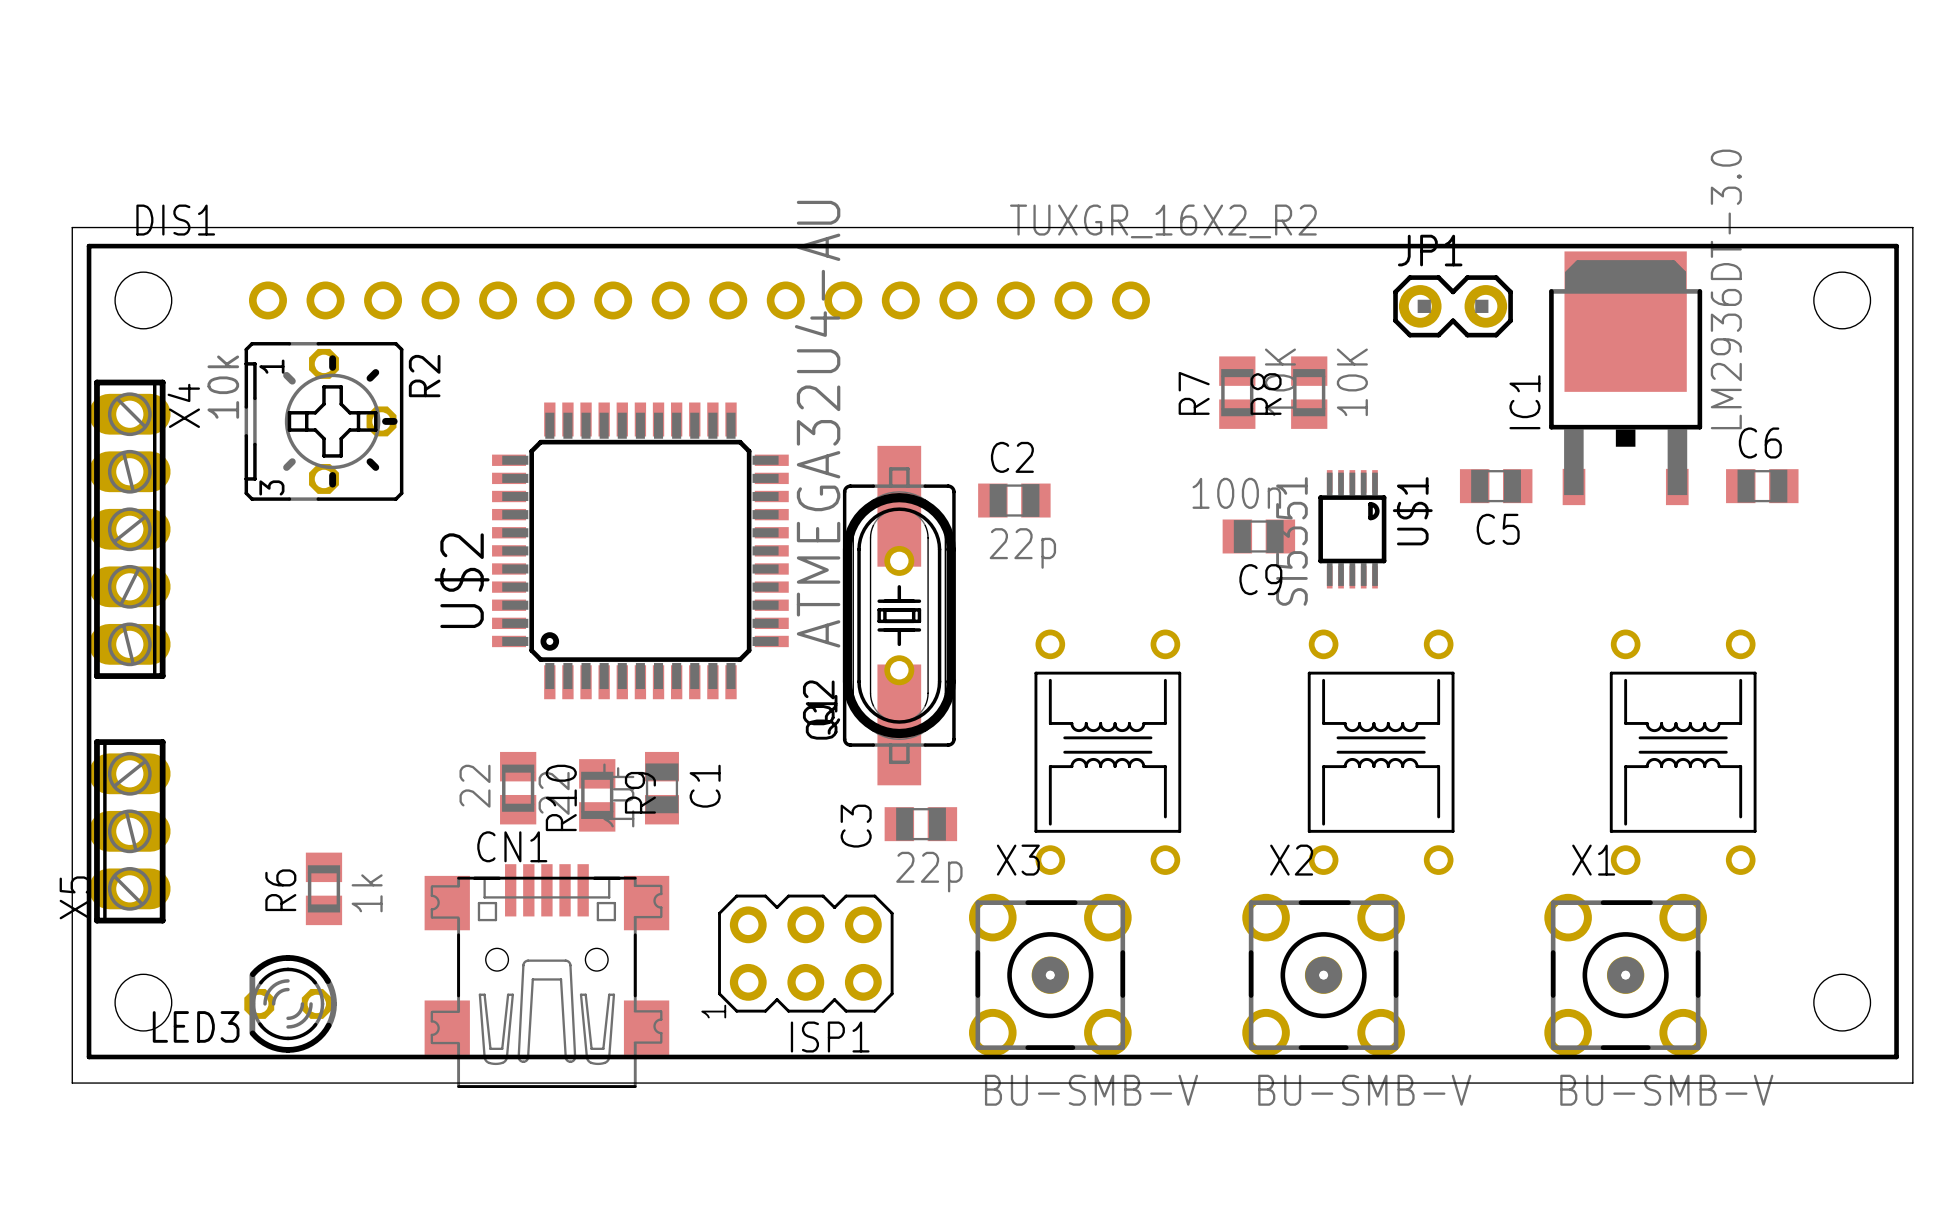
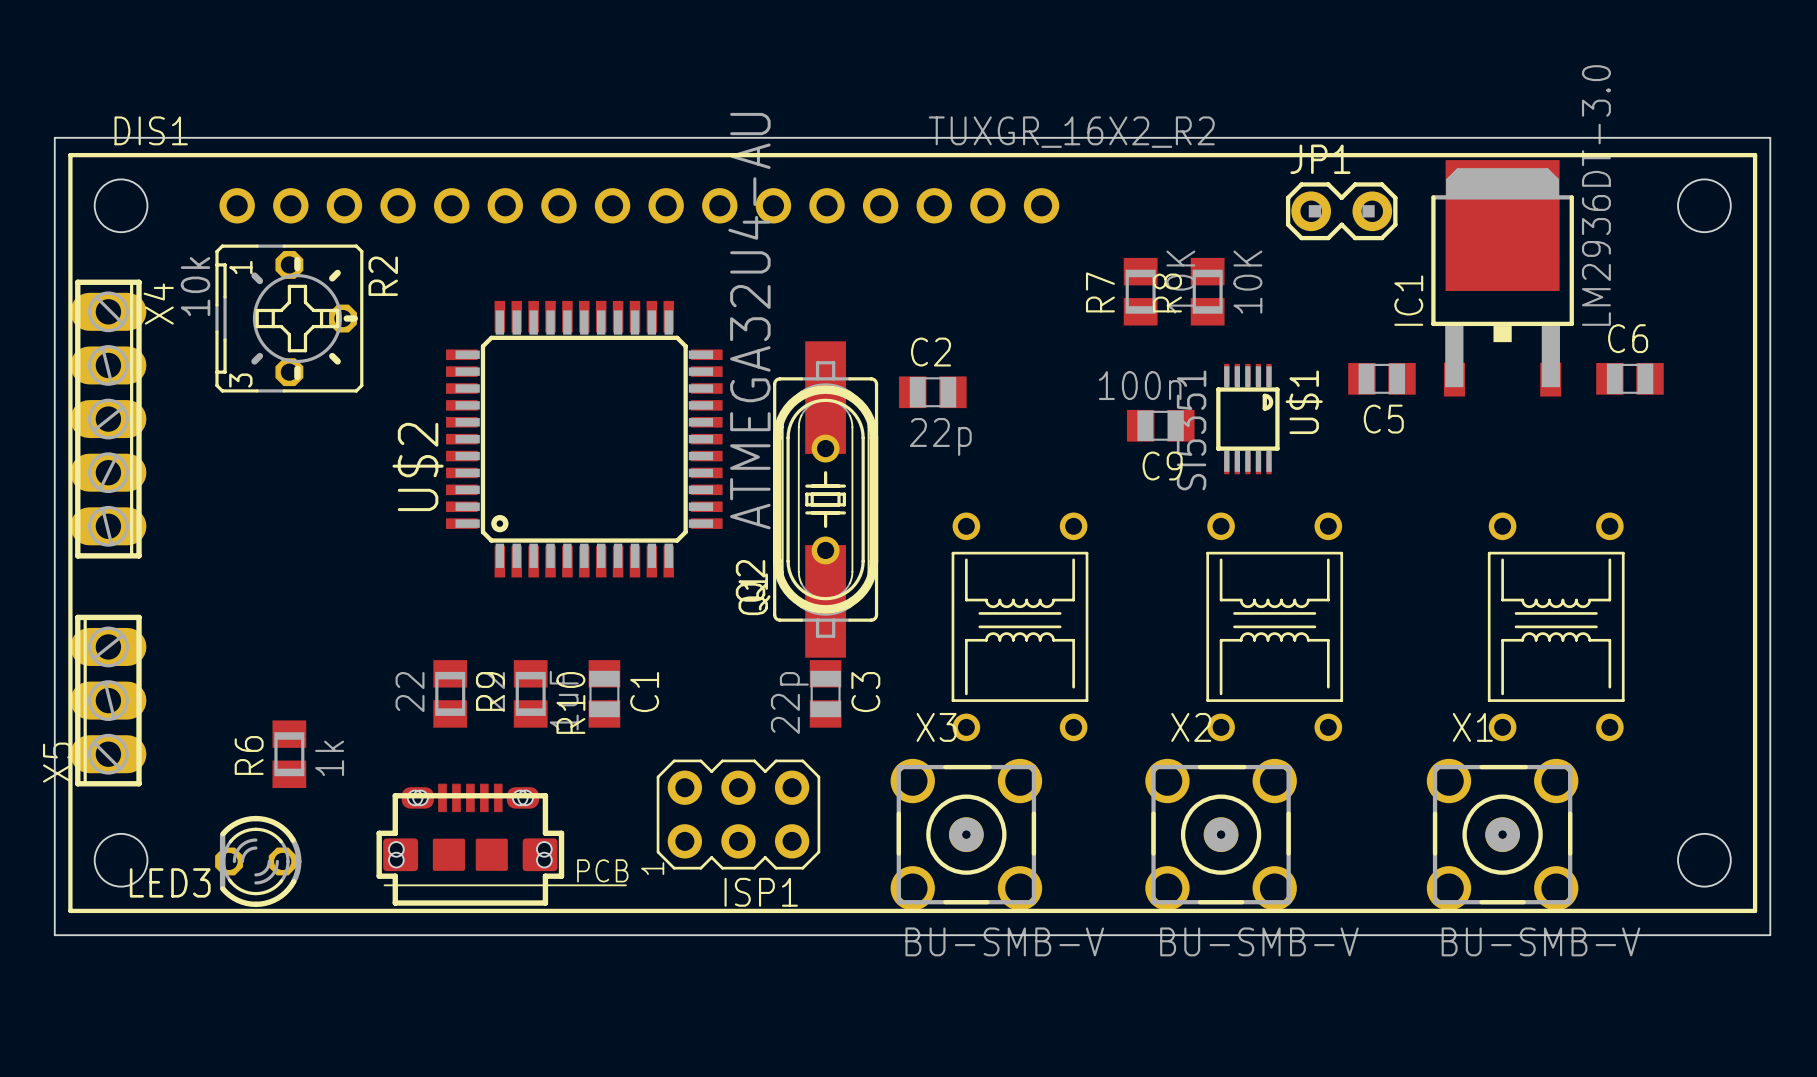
R10 position: (518, 788) -> (530, 693)
C1 position: (661, 788) -> (604, 693)
R9 position: (597, 795) -> (450, 693)
C3 rotation: 0° (920, 824) -> 90° clockwise (825, 693)
C3 name position: C3 (856, 826) -> C3 (865, 692)
CN1: (546, 976) -> none
part: none -> (501, 844)

